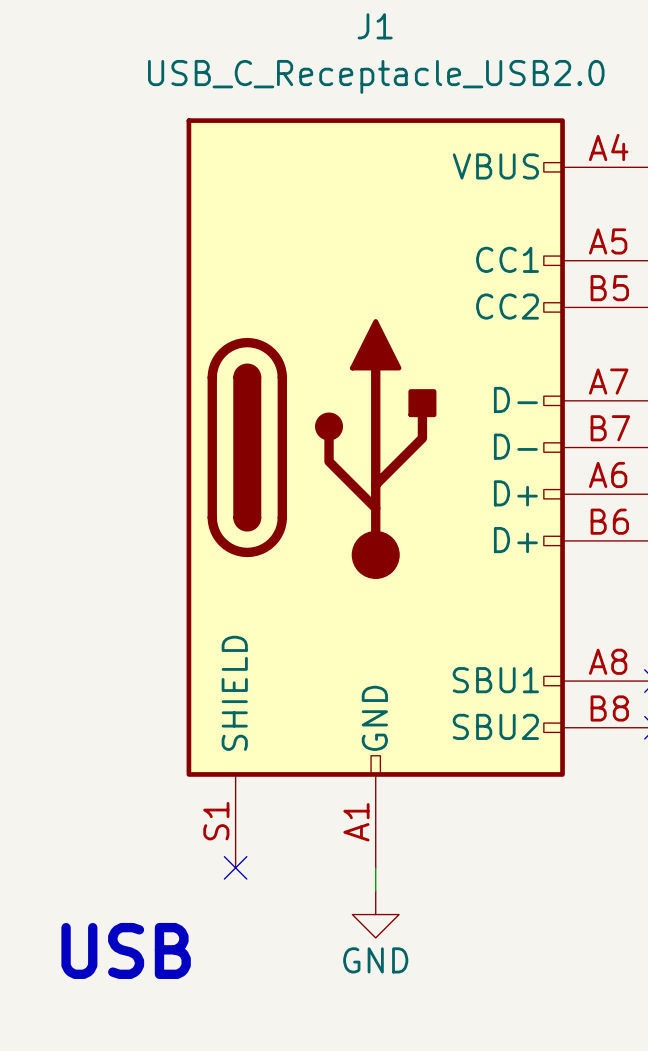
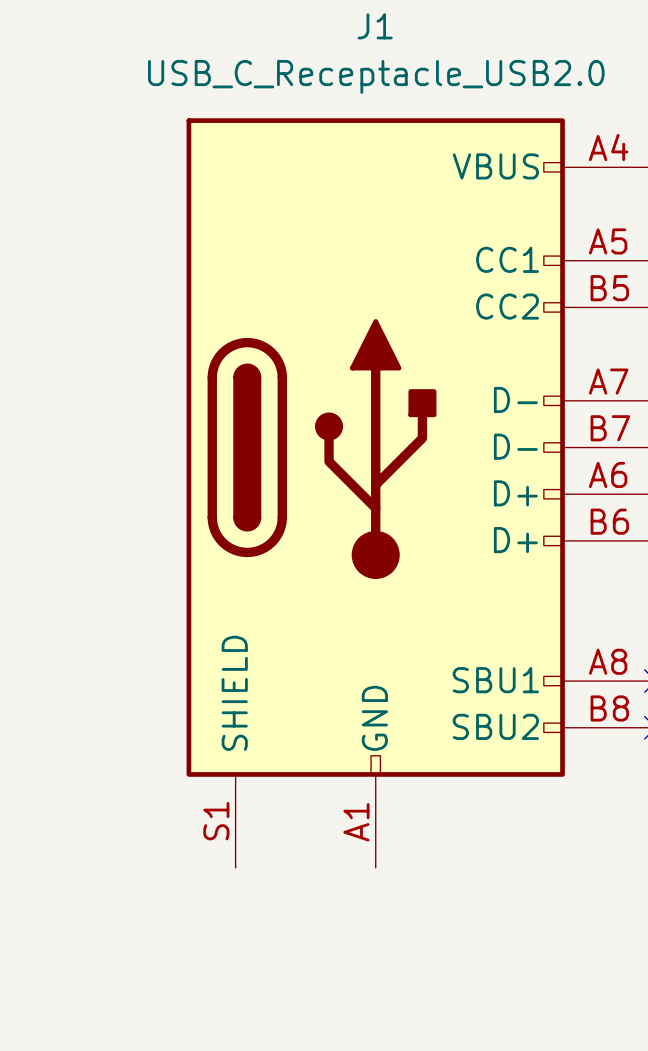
no-connect mark: (235, 867) -> none
wire: (375, 867) (375, 891) -> none
power symbol: GND (375, 914) -> none
text: USB (126, 950) -> none

